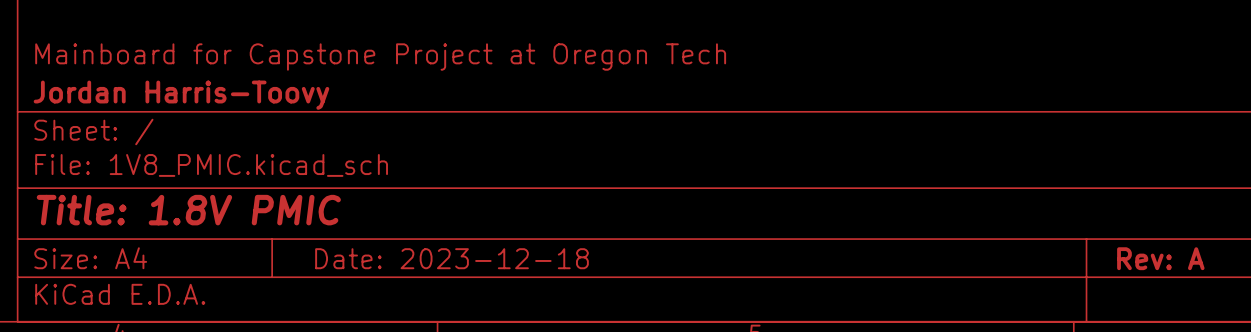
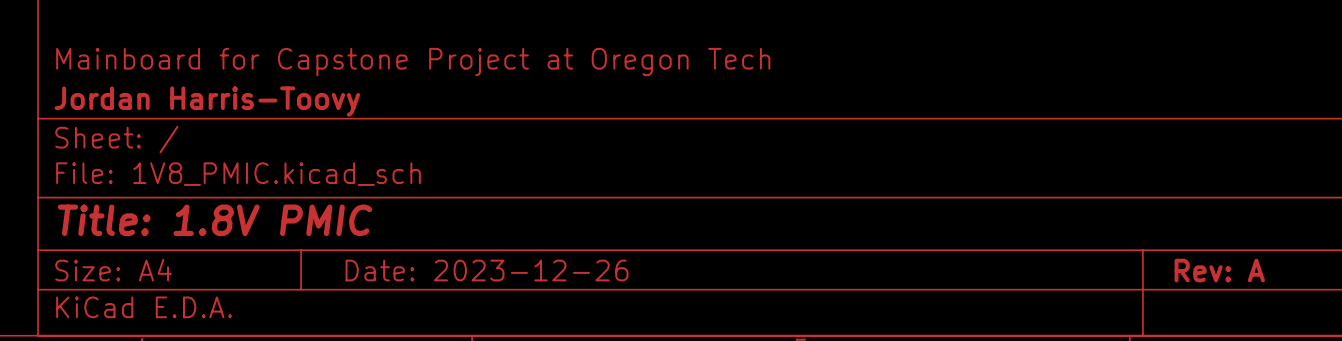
title block: Date: 2023-12-18 (452, 258) -> Date: 2023-12-26 (487, 270)

